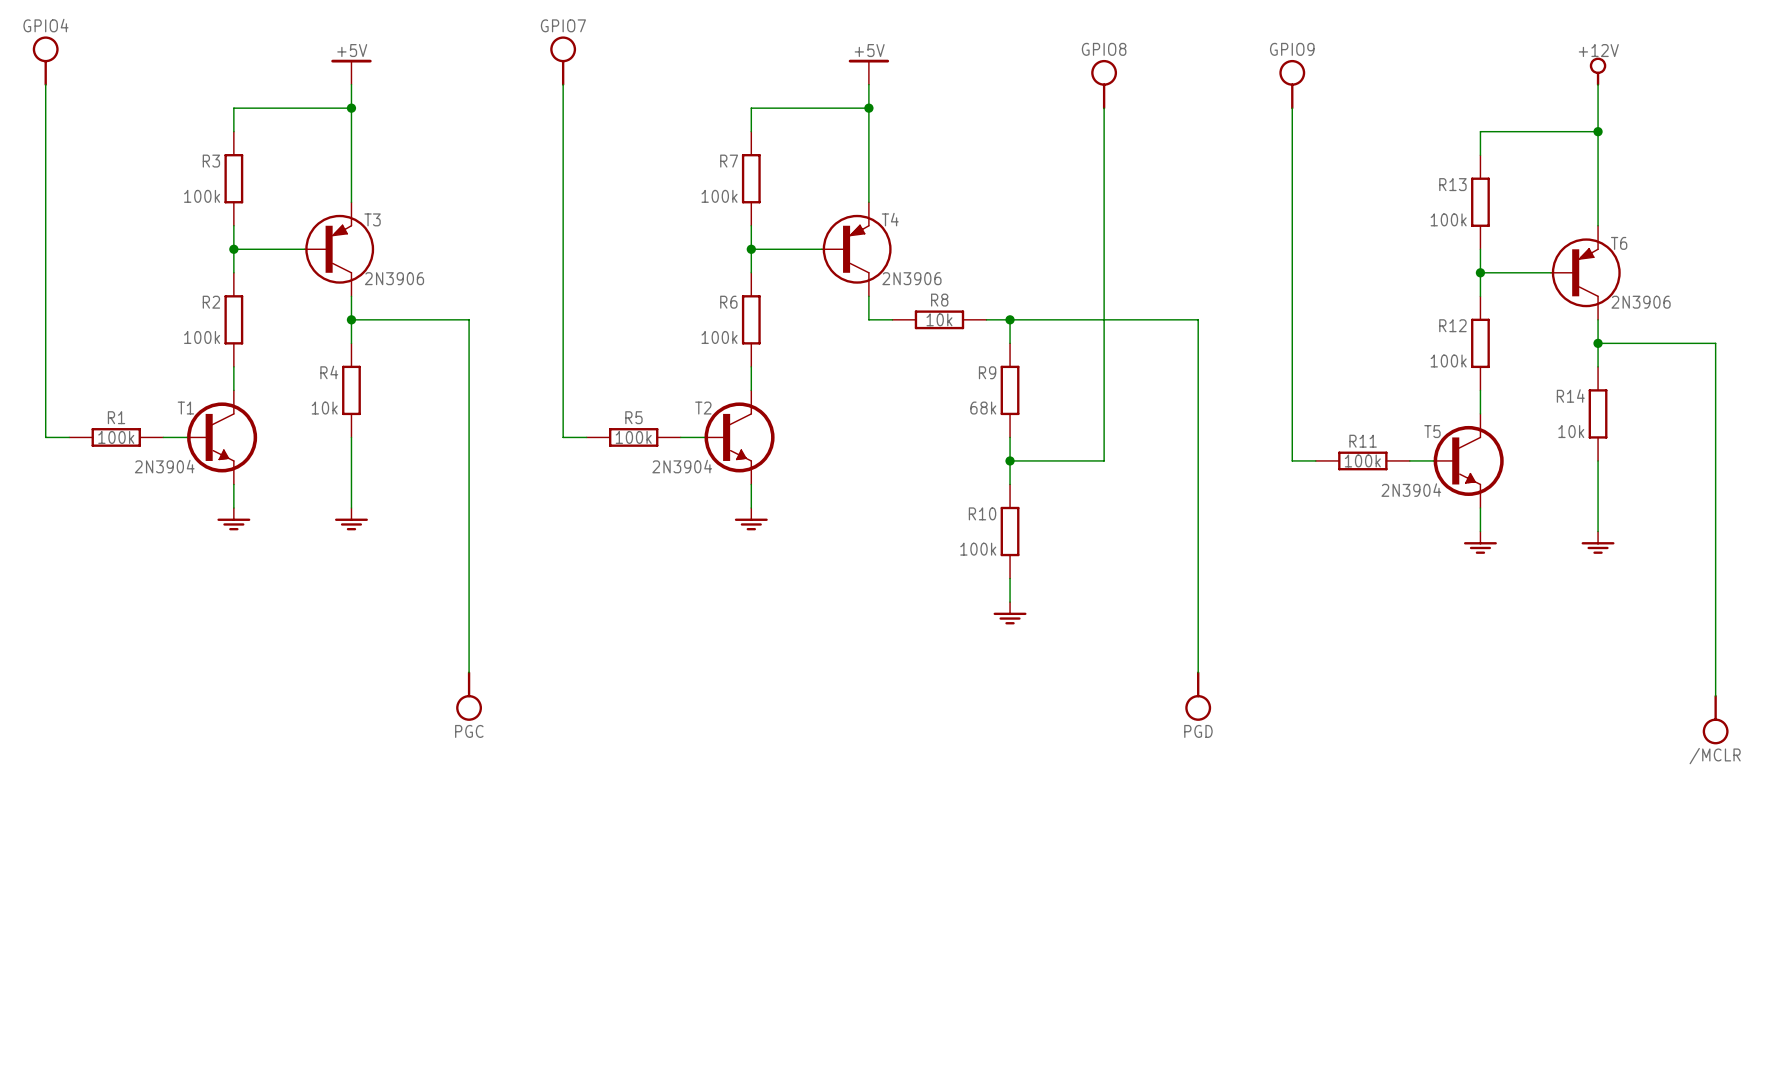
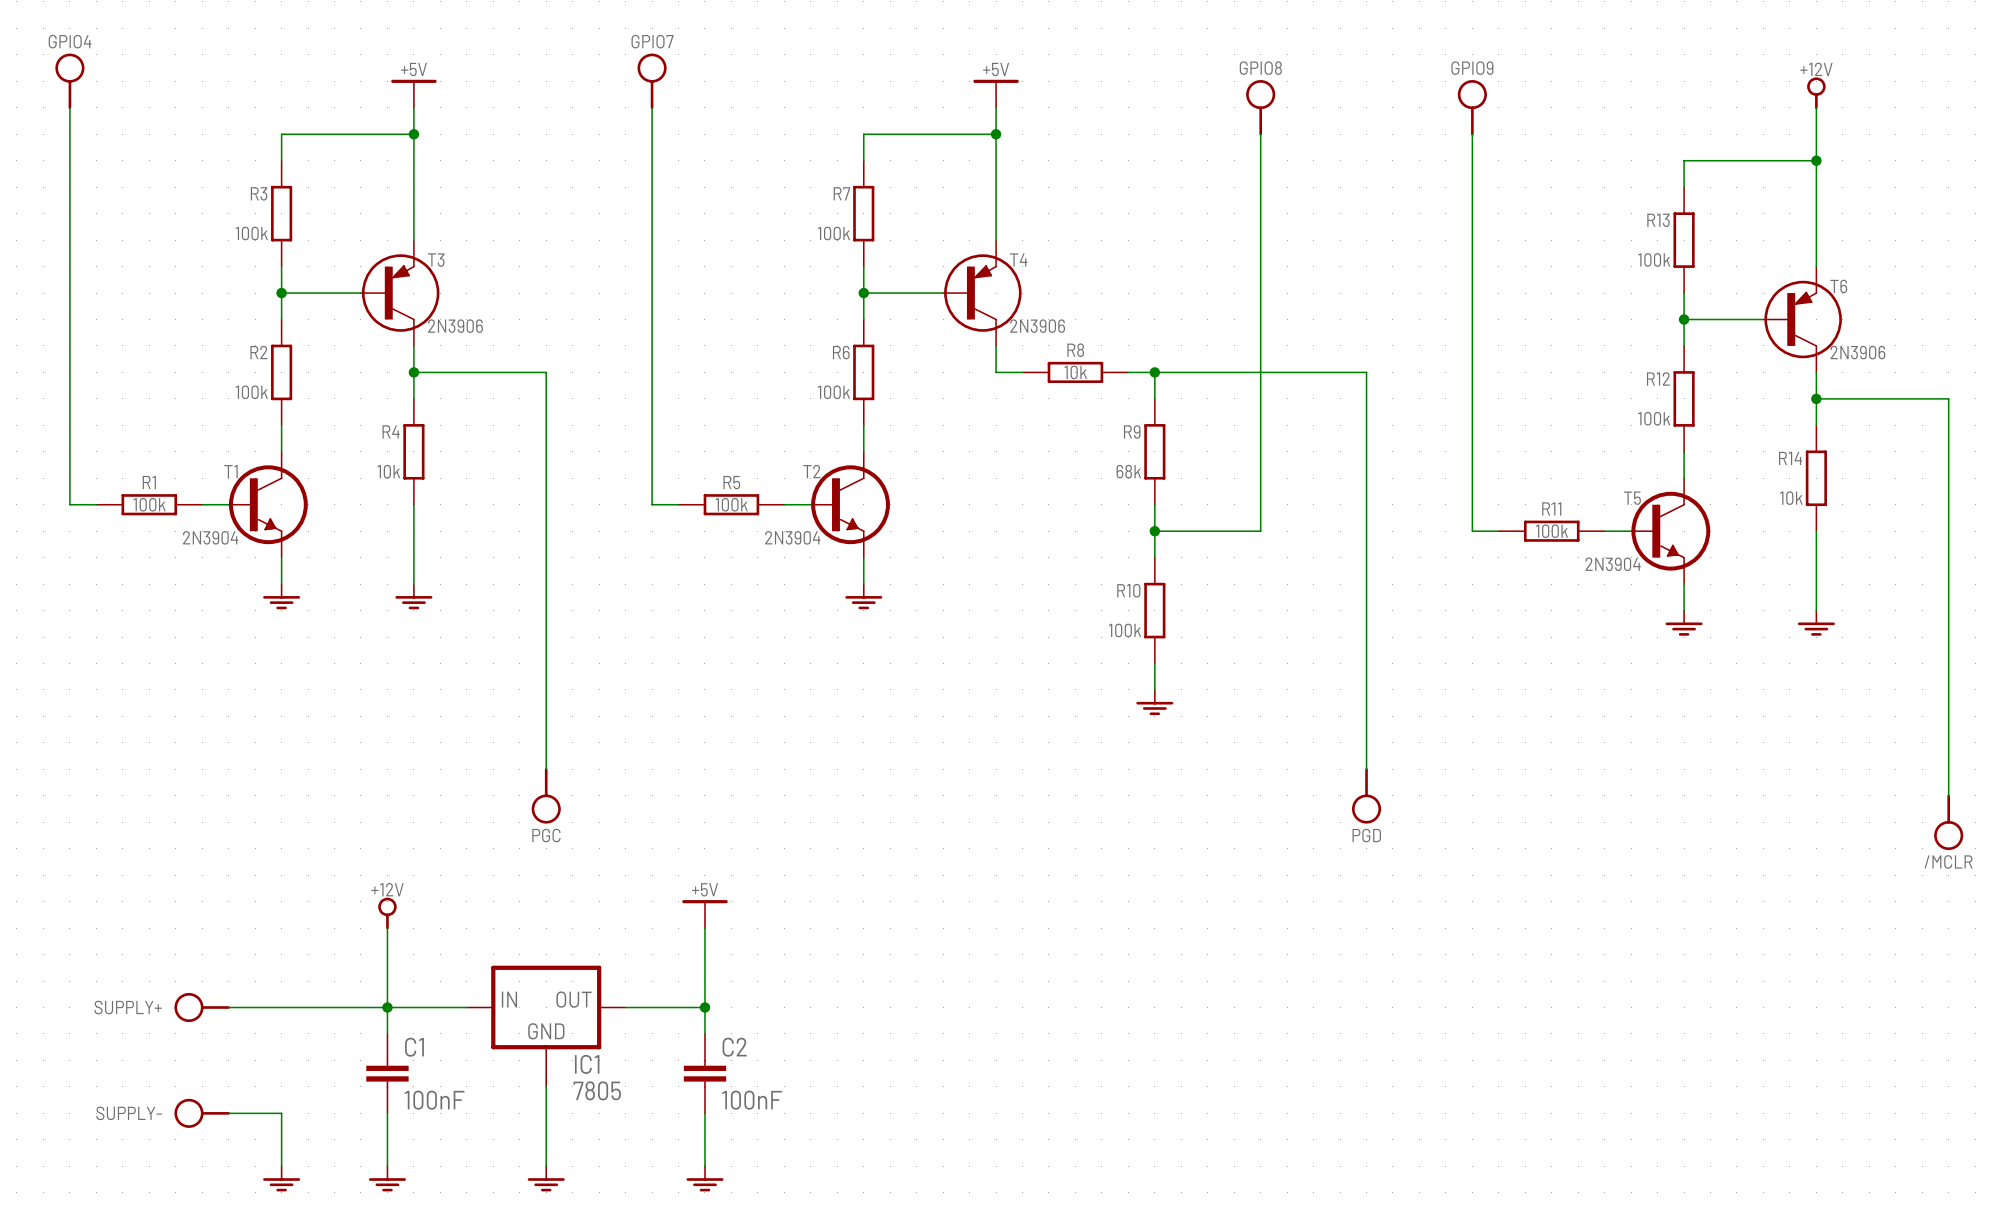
power symbol: none -> +12V (387, 913)
power symbol: none -> +5V (704, 914)
wire: none -> (387, 928) (387, 1033)
wire: none -> (704, 928) (704, 1033)
SUPPLY+: none -> (202, 1007)
wire: none -> (228, 1007) (466, 1007)
junction: none -> (387, 1007)
wire: none -> (625, 1007) (704, 1007)
junction: none -> (704, 1007)
IC1: none -> 7805 (546, 1026)
C1: none -> 100nF (387, 1073)
C2: none -> 100nF (704, 1073)
wire: none -> (546, 1086) (546, 1166)
SUPPLY-: none -> (202, 1113)
wire: none -> (228, 1113) (281, 1113) (281, 1166)
wire: none -> (387, 1113) (387, 1166)
wire: none -> (704, 1113) (704, 1166)
power symbol: none -> (281, 1178)
power symbol: none -> (387, 1178)
power symbol: none -> (546, 1178)
power symbol: none -> (704, 1178)

